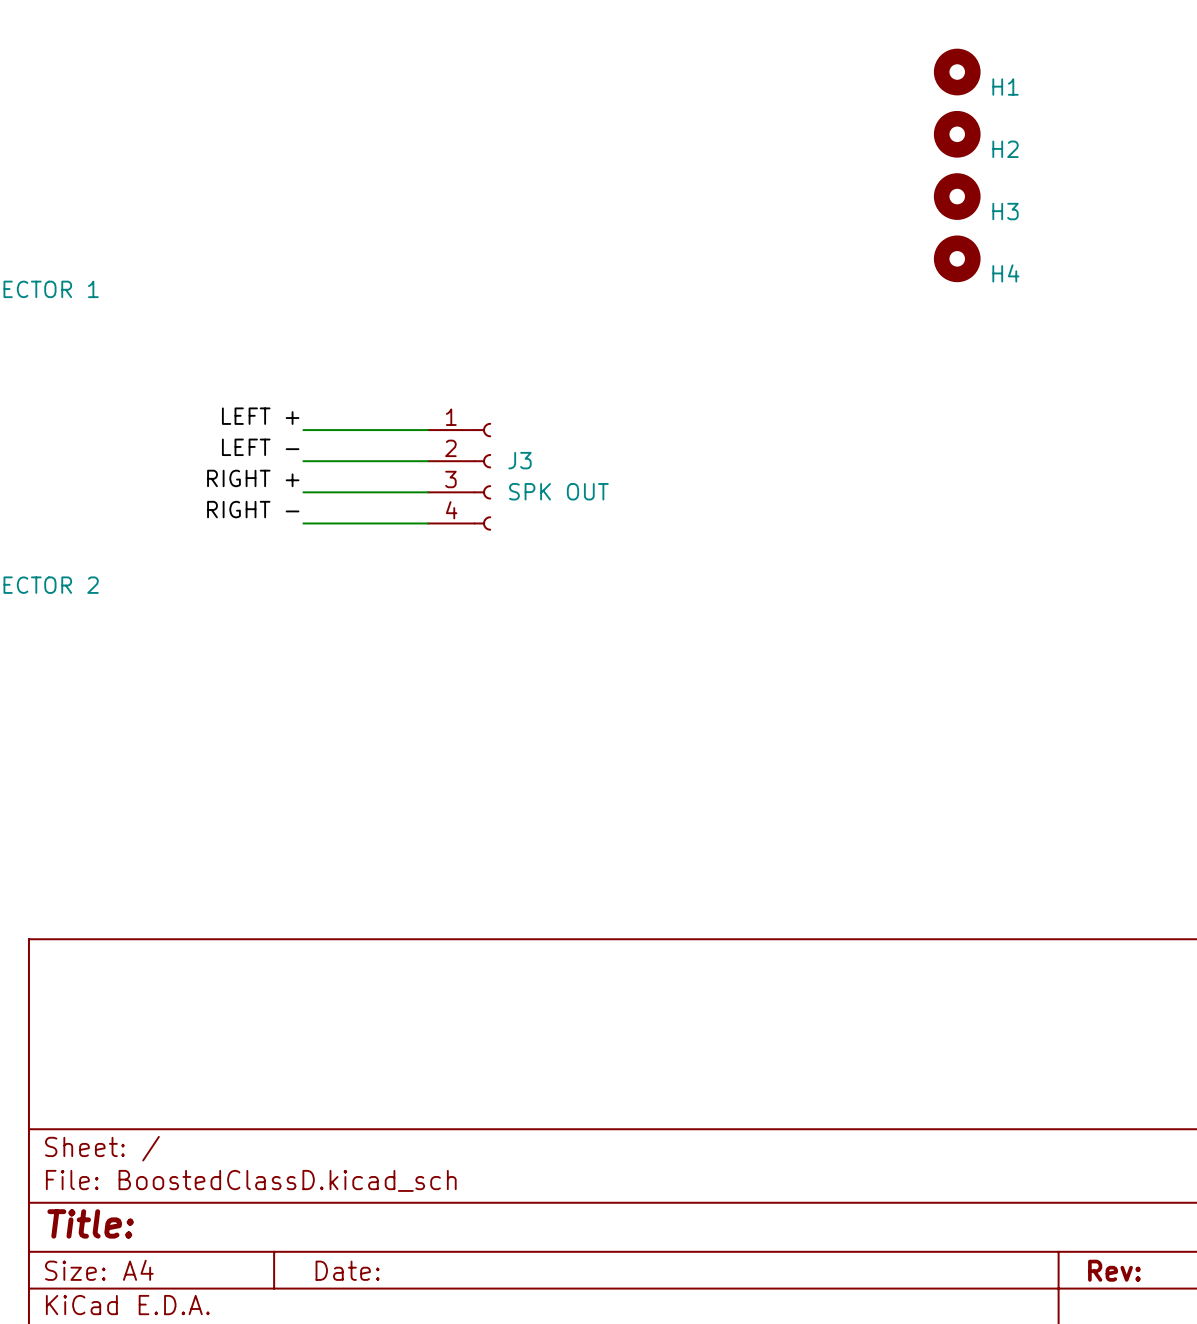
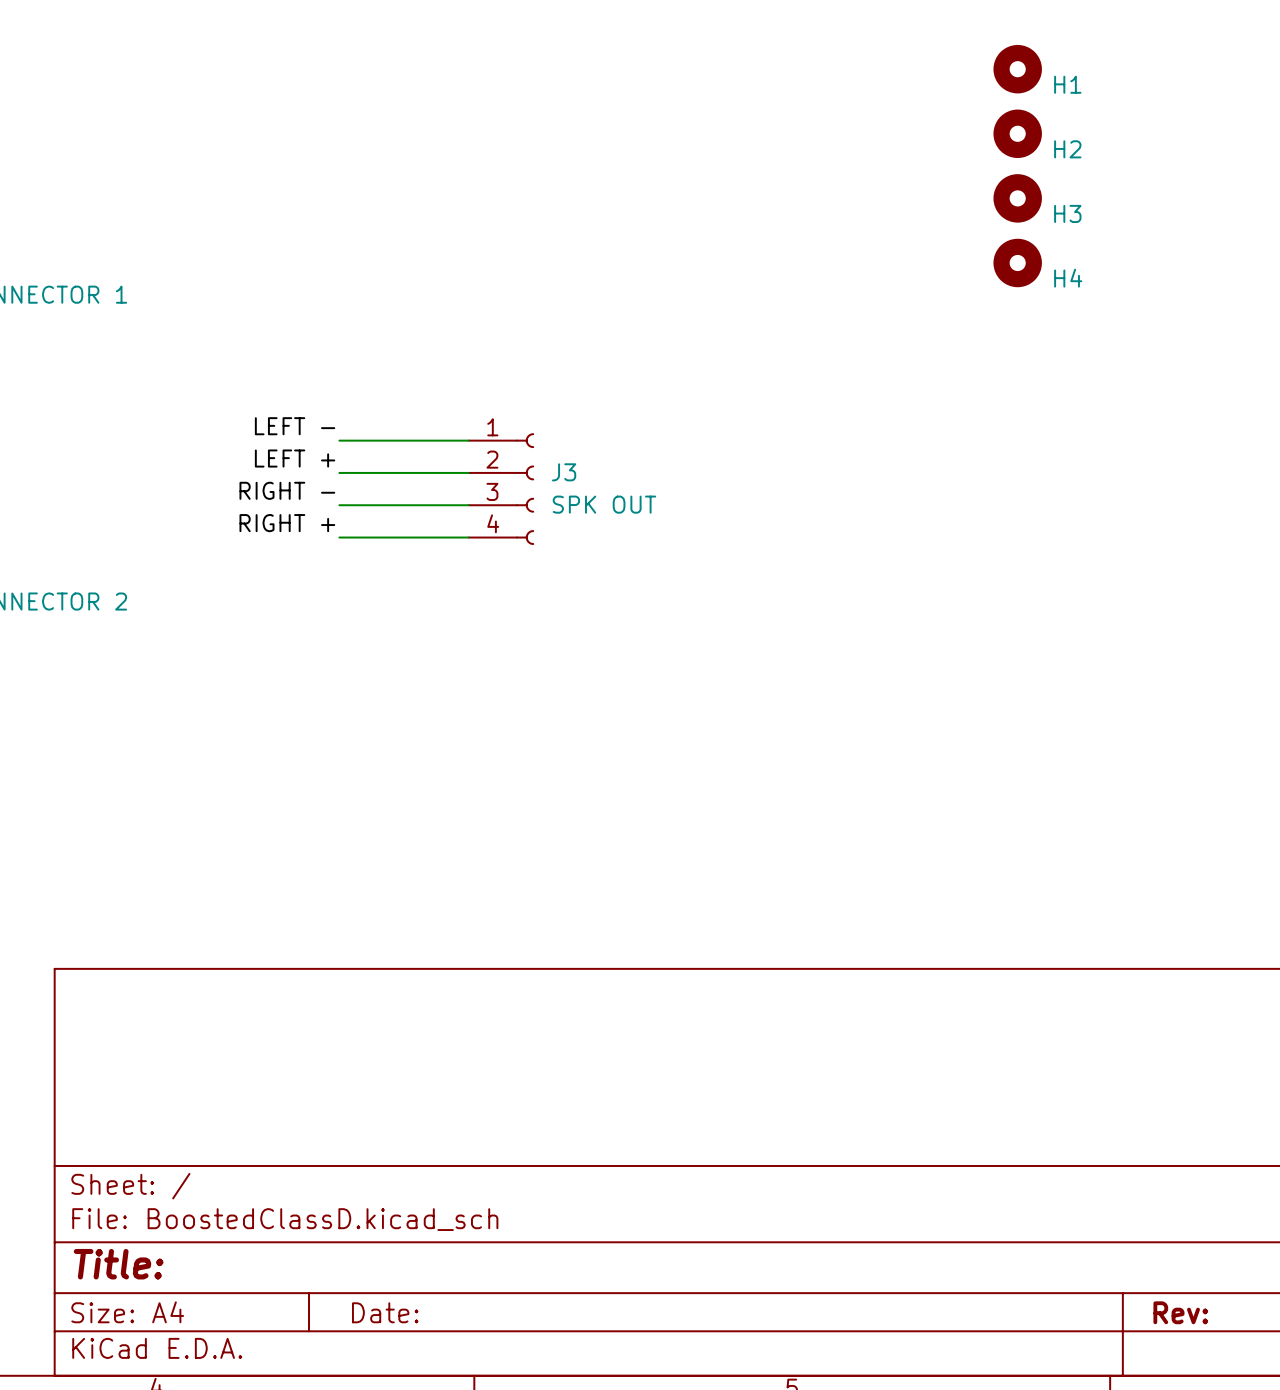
label: LEFT + (260, 416) -> LEFT - (295, 426)
label: LEFT - (260, 447) -> LEFT + (295, 458)
label: RIGHT + (253, 478) -> RIGHT - (287, 490)
label: RIGHT - (253, 509) -> RIGHT + (287, 523)

